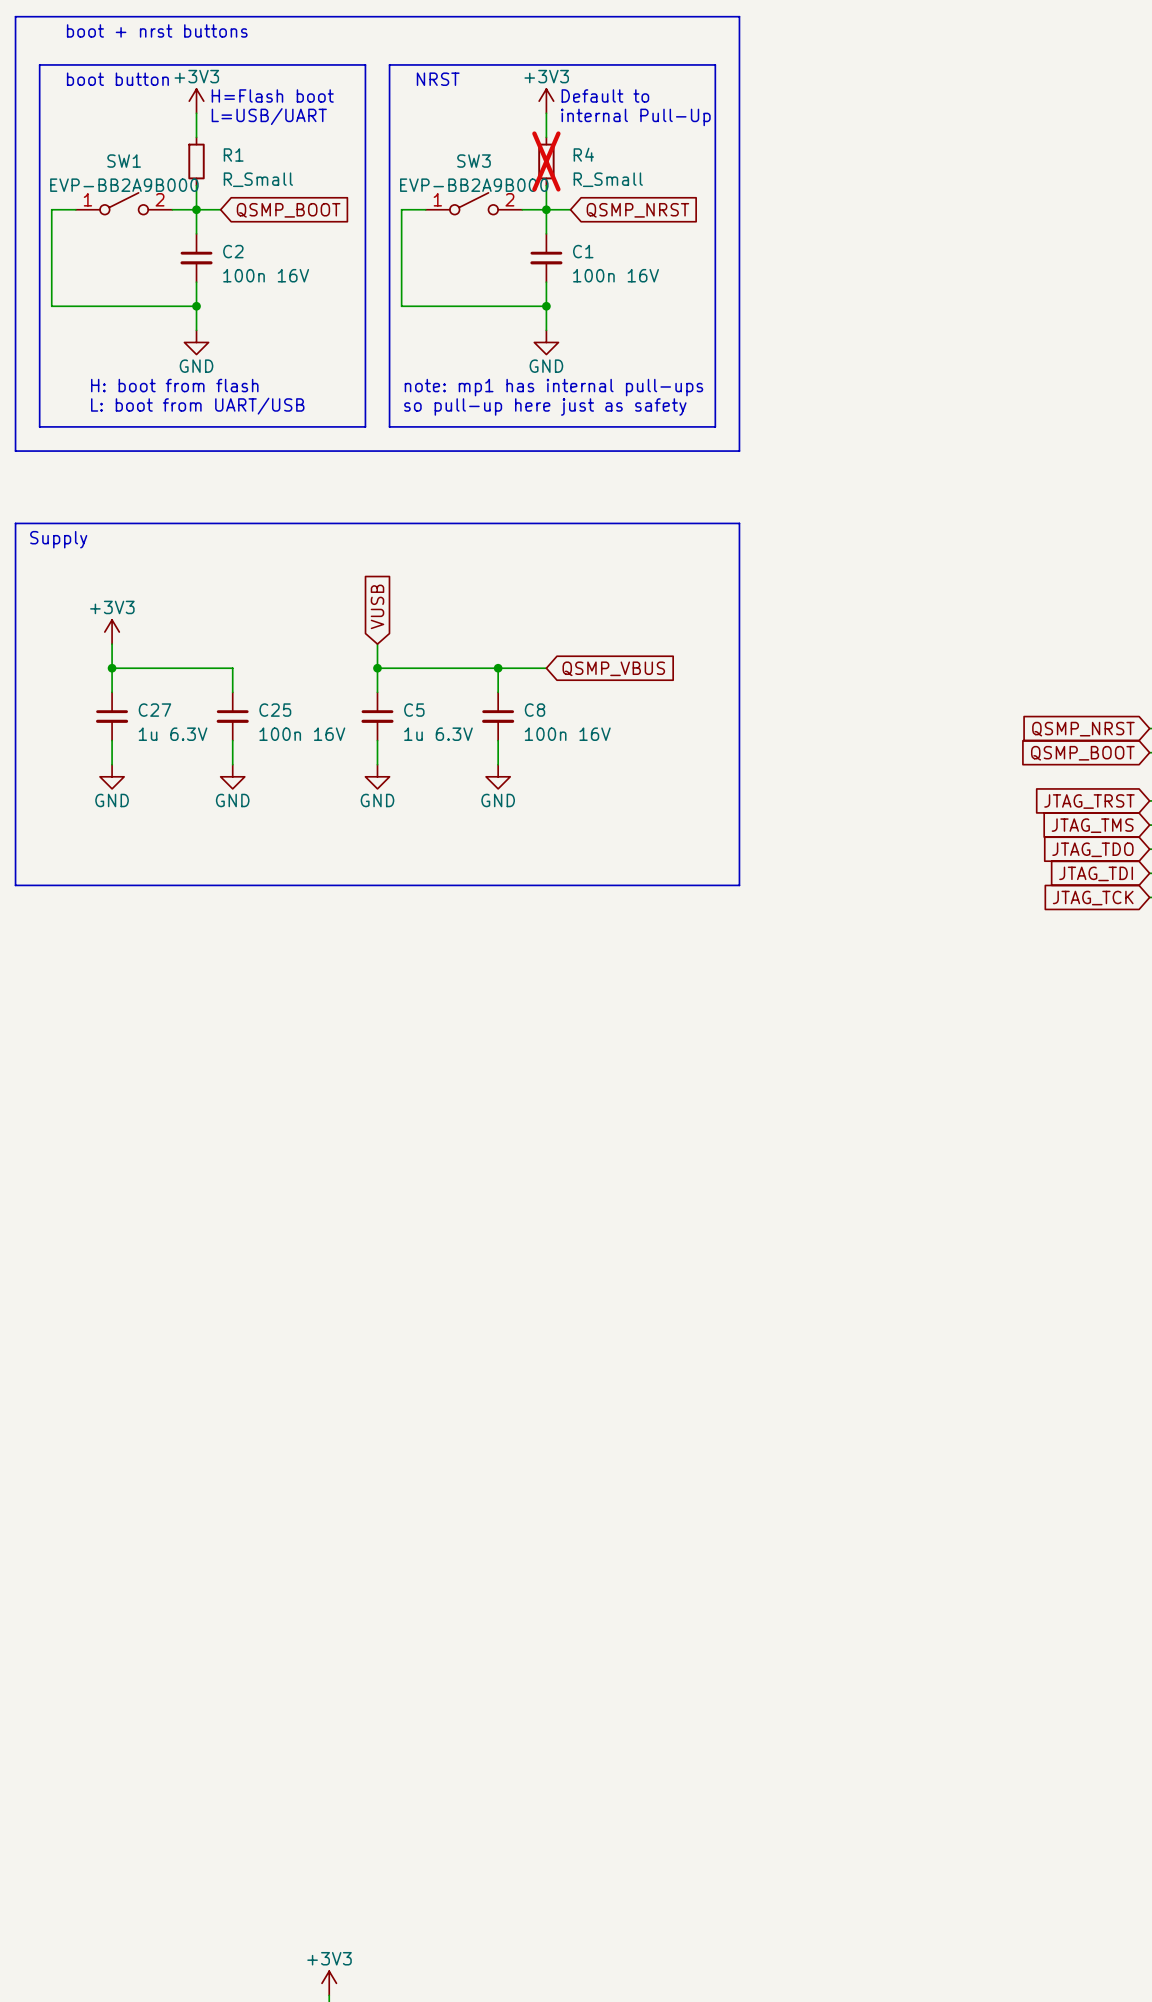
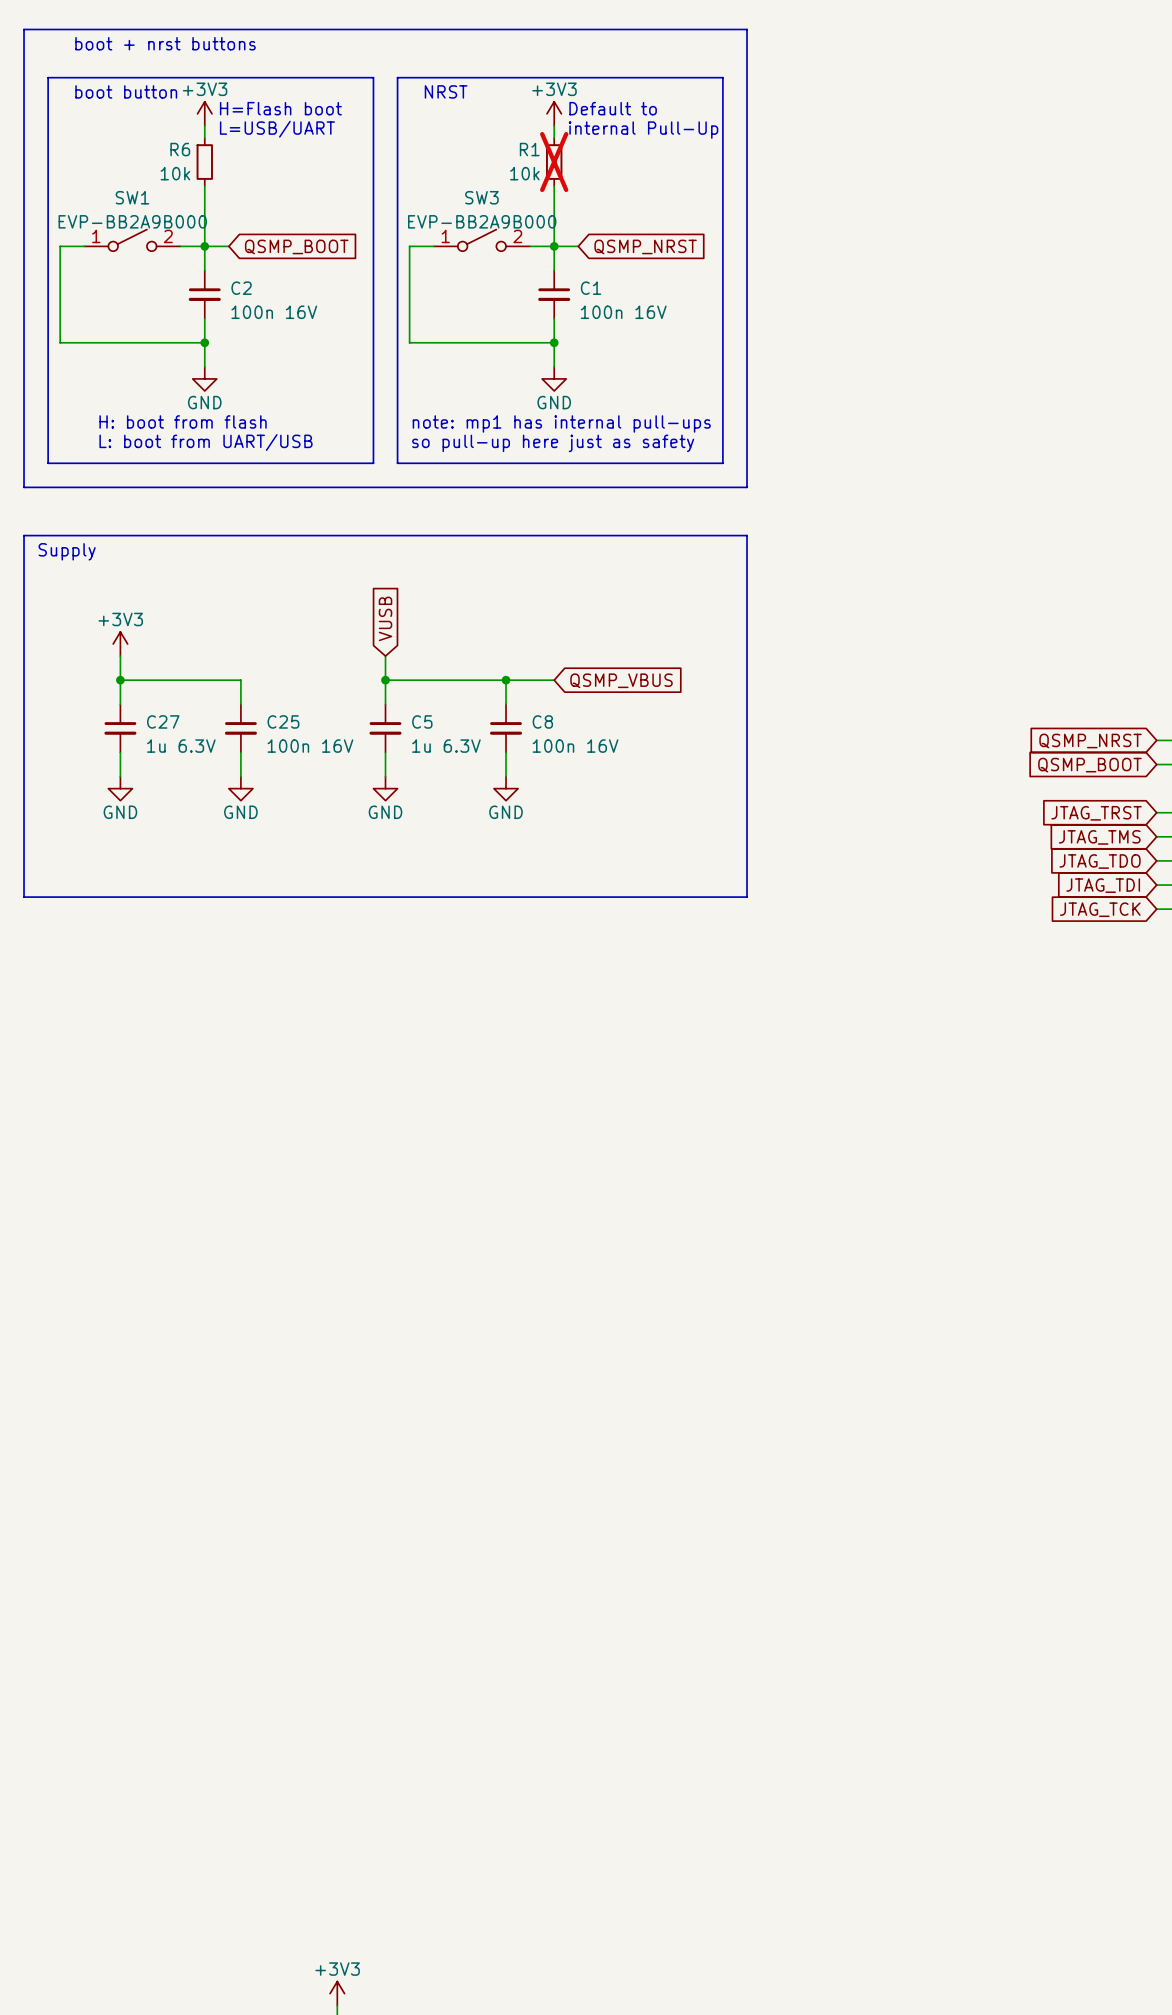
R6: none -> 10k (204, 162)
R1 do-not-place cross: none -> (554, 162)
R1 name position: R1 (233, 155) -> R1 (529, 149)
R1 position: (196, 161) -> (554, 162)
R4: R_Small (546, 161) -> none
R1 value: R_Small (258, 179) -> 10k (524, 173)
SW1 position: (124, 203) -> (132, 240)
SW3 position: (474, 203) -> (481, 240)
wire: (75, 209) (51, 209) (51, 233) -> (84, 246) (60, 246)
wire: (172, 209) (220, 209) -> (180, 246) (228, 246)
junction position: (196, 209) -> (204, 246)
wire: (425, 209) (401, 209) (401, 233) -> (433, 246) (409, 246)
wire: (522, 209) (570, 209) -> (530, 246) (578, 246)
junction position: (546, 209) -> (554, 246)
global label position: QSMP_BOOT (288, 210) -> QSMP_BOOT (296, 246)
global label position: QSMP_NRST (637, 210) -> QSMP_NRST (645, 246)
C2 position: (196, 258) -> (204, 294)
C1 position: (546, 258) -> (554, 294)
wire: (196, 282) (196, 306) (51, 306) -> (204, 366) (204, 342) (60, 342) (60, 318)
wire: (546, 282) (546, 306) (401, 306) -> (554, 366) (554, 342) (409, 342) (409, 318)
junction position: (196, 306) -> (204, 342)
junction position: (546, 306) -> (554, 342)
power symbol position: GND (196, 342) -> GND (204, 378)
power symbol position: GND (546, 342) -> GND (554, 378)
text position: H: boot from flash (174, 385) -> H: boot from flash (183, 421)
text position: note: mp1 has internal pull-ups (553, 387) -> note: mp1 has internal pull-ups (561, 423)
text position: L: boot from UART/USB (197, 406) -> L: boot from UART/USB (206, 442)
text position: so pull-up here just as safety (545, 406) -> so pull-up here just as safety (553, 443)
line: (39, 426) (365, 426) -> none
line: (389, 426) (715, 426) -> (397, 439) (397, 463)
line: (15, 451) (39, 451) -> (48, 439) (48, 463)
line: none -> (24, 463) (24, 487) (747, 487) (747, 463)
line: (365, 451) (389, 451) -> (373, 463) (373, 439)
line: (715, 451) (739, 451) -> (722, 463) (722, 439)

